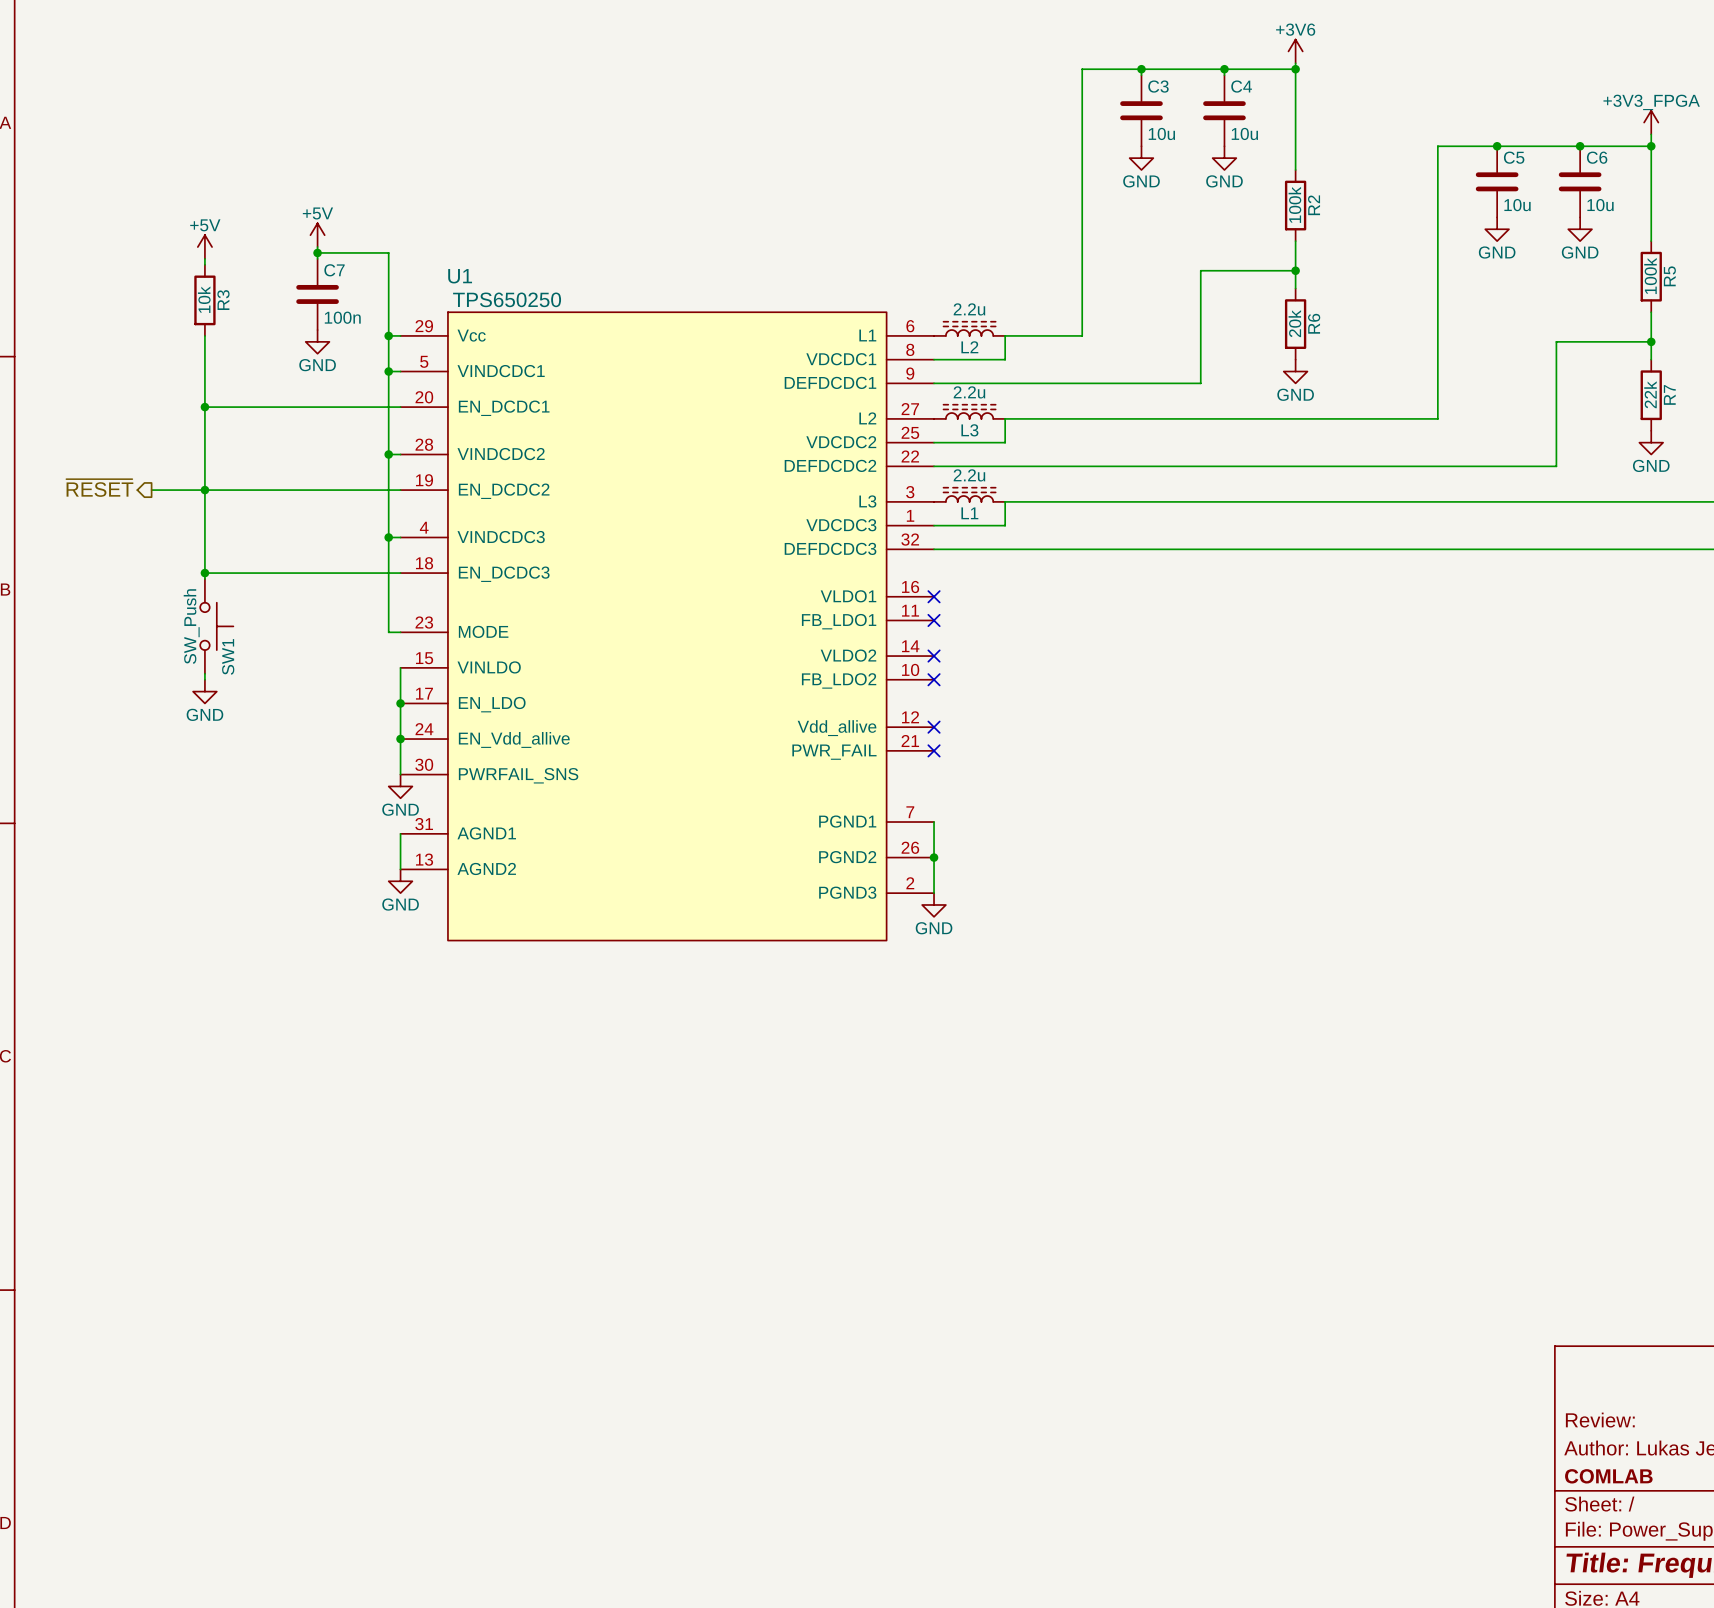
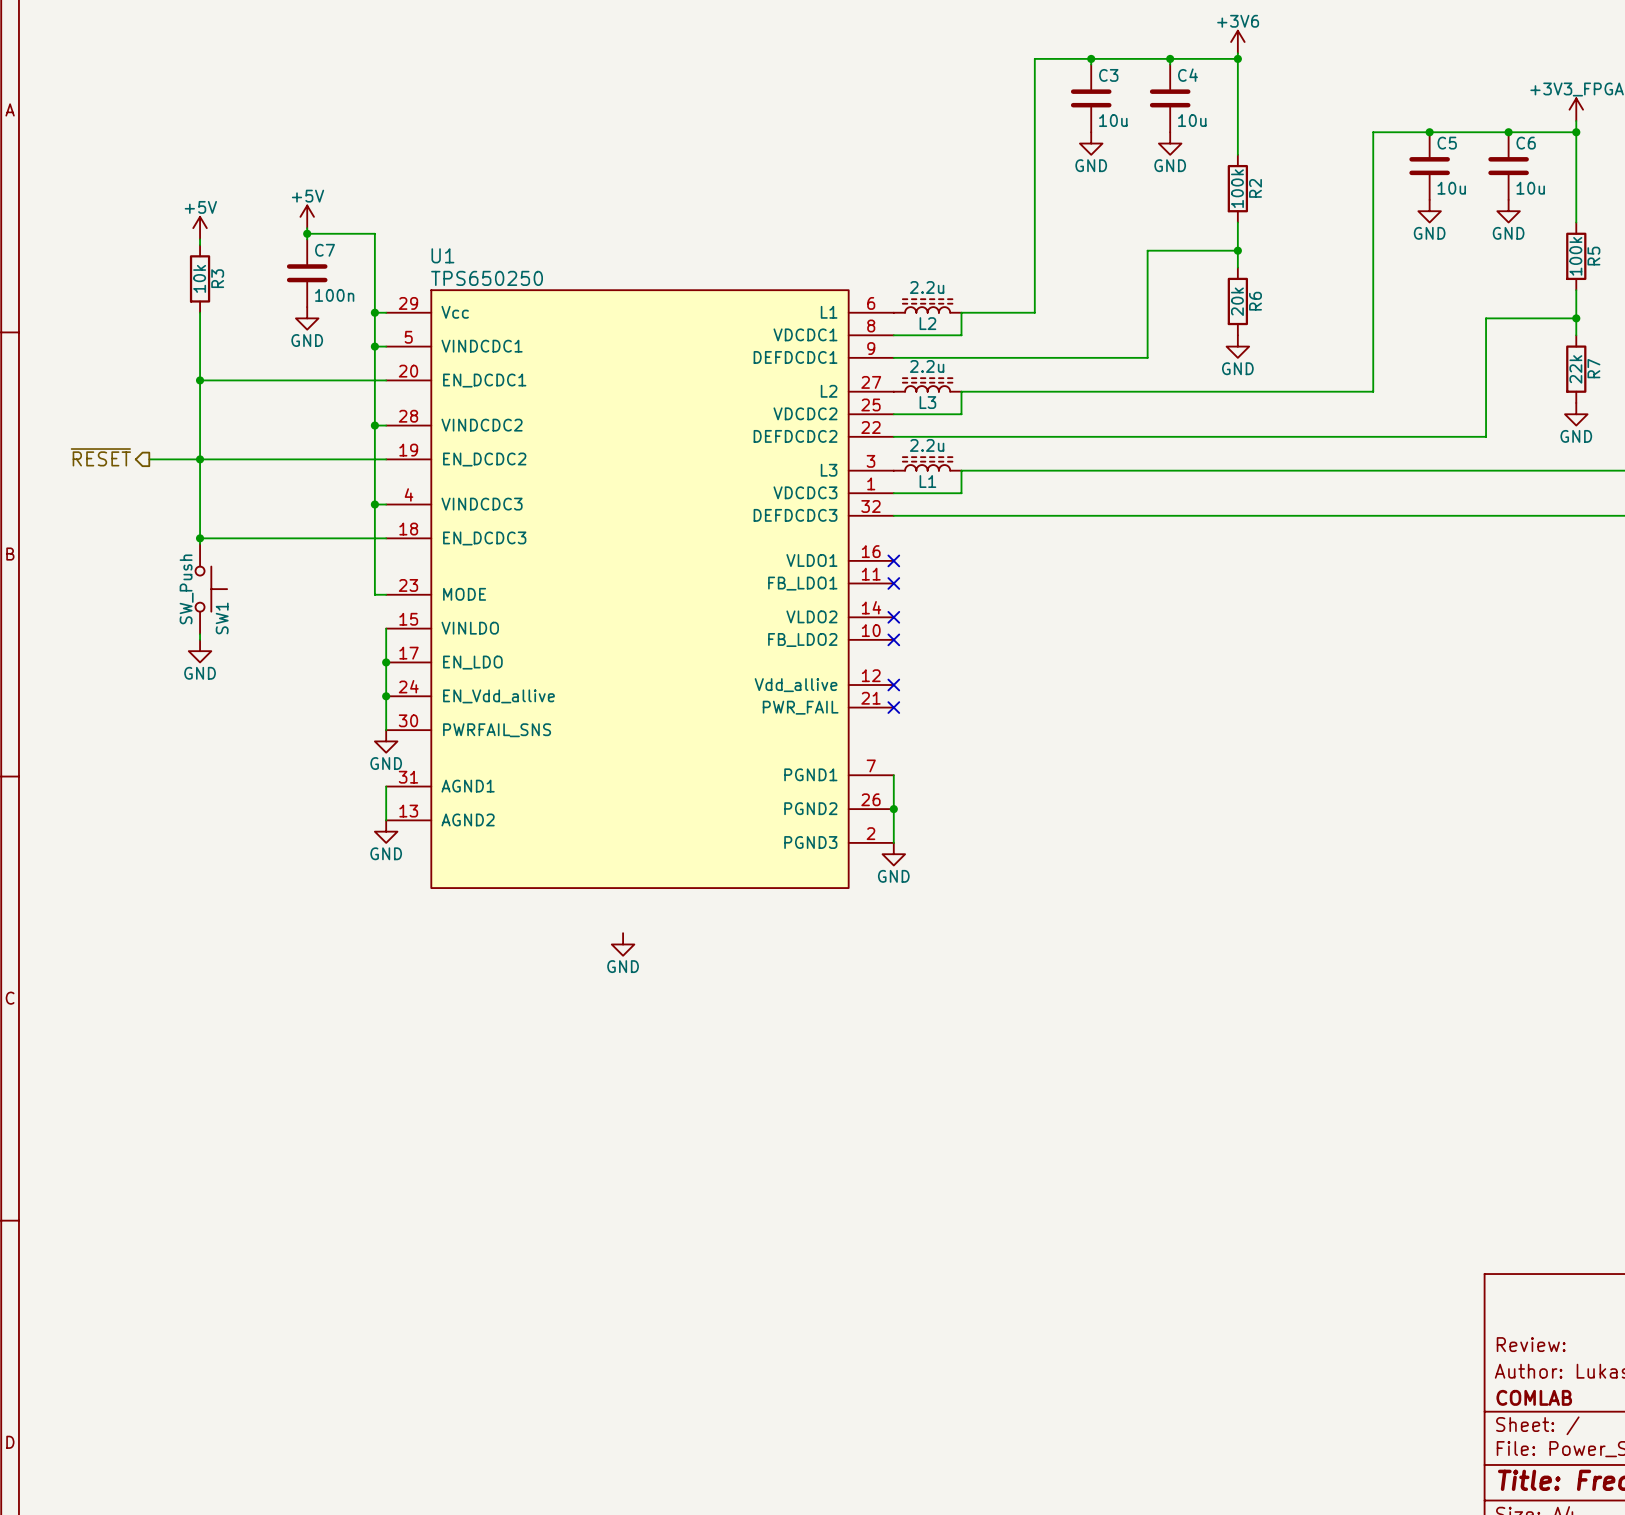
power symbol: none -> GND (623, 944)

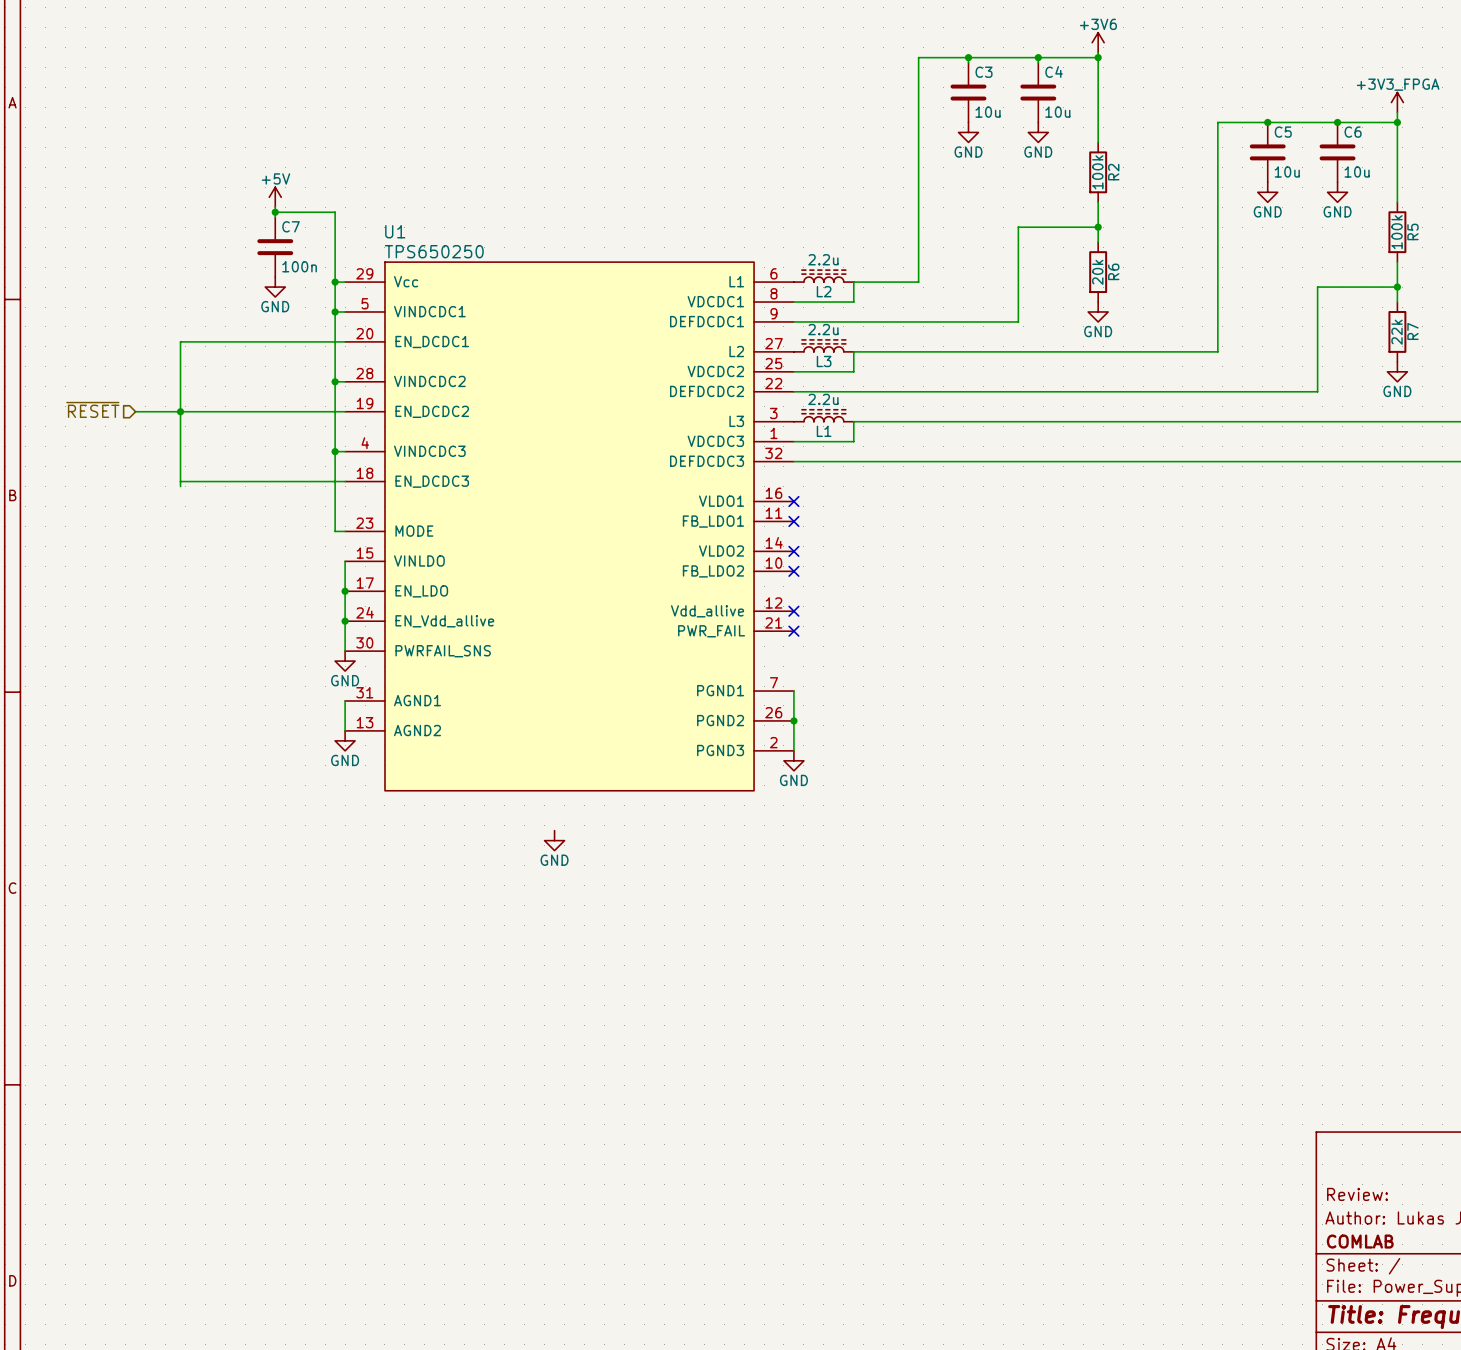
power symbol: +5V (200, 228) -> none
wire: (200, 239) (200, 245) -> none
R3: 10k (200, 278) -> none
wire: (200, 312) (200, 380) -> none
junction: (200, 380) -> none
hierarchical label shape: output (100, 457) -> input (92, 409)
junction: (200, 538) -> none
SW1: SW_Push (211, 589) -> none
wire: (200, 634) (200, 639) -> none
power symbol: GND (200, 651) -> none

